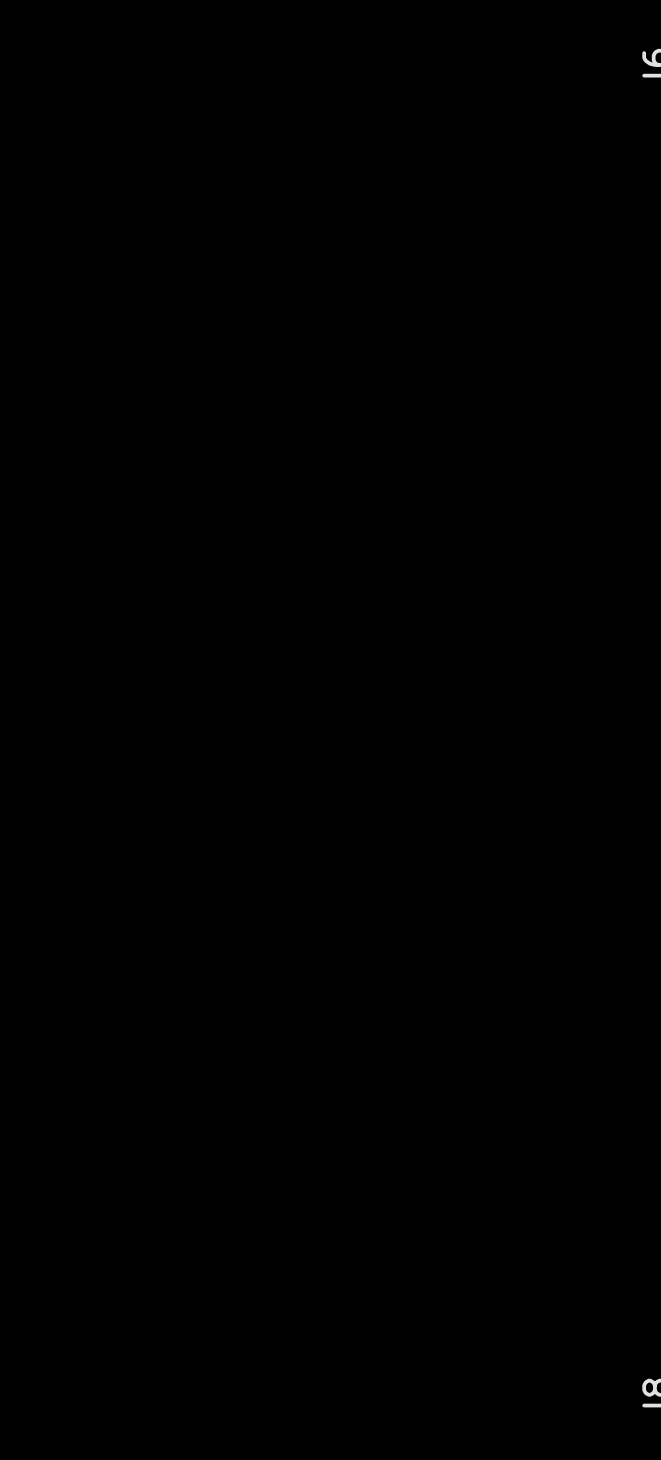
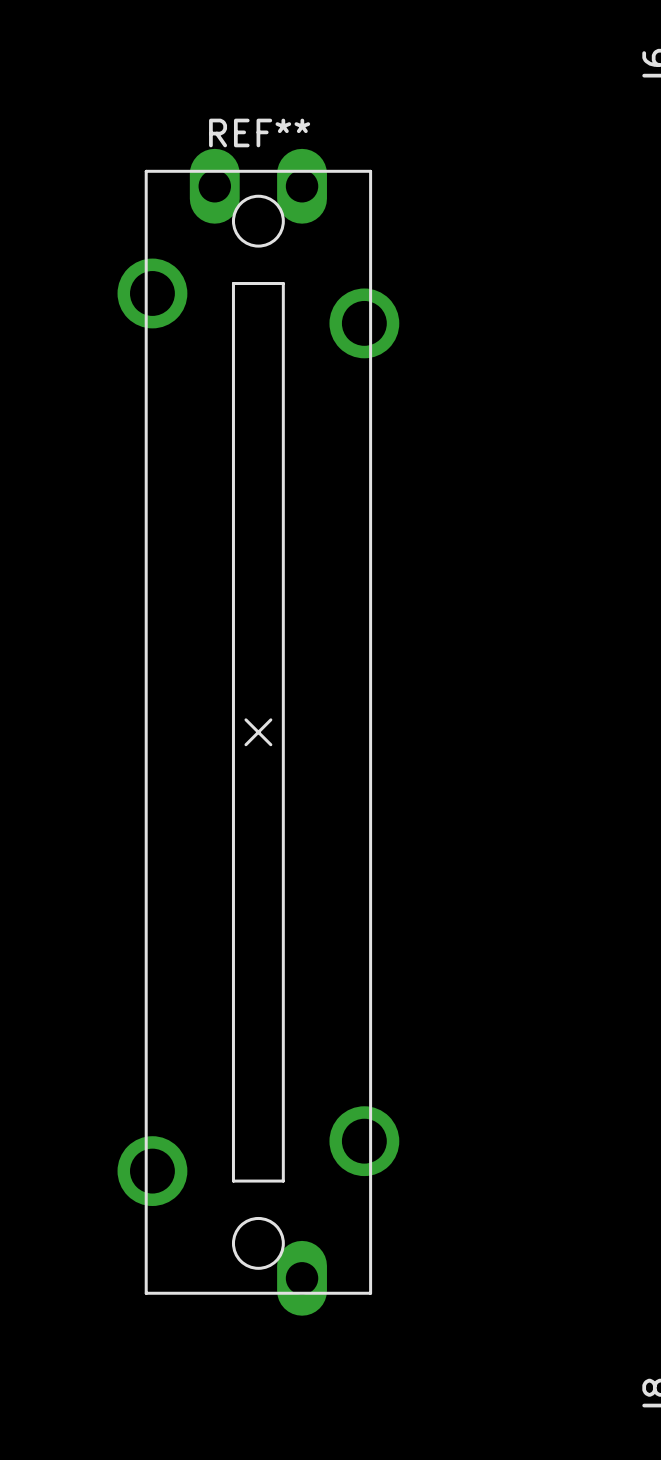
REF**: none -> (258, 732)

